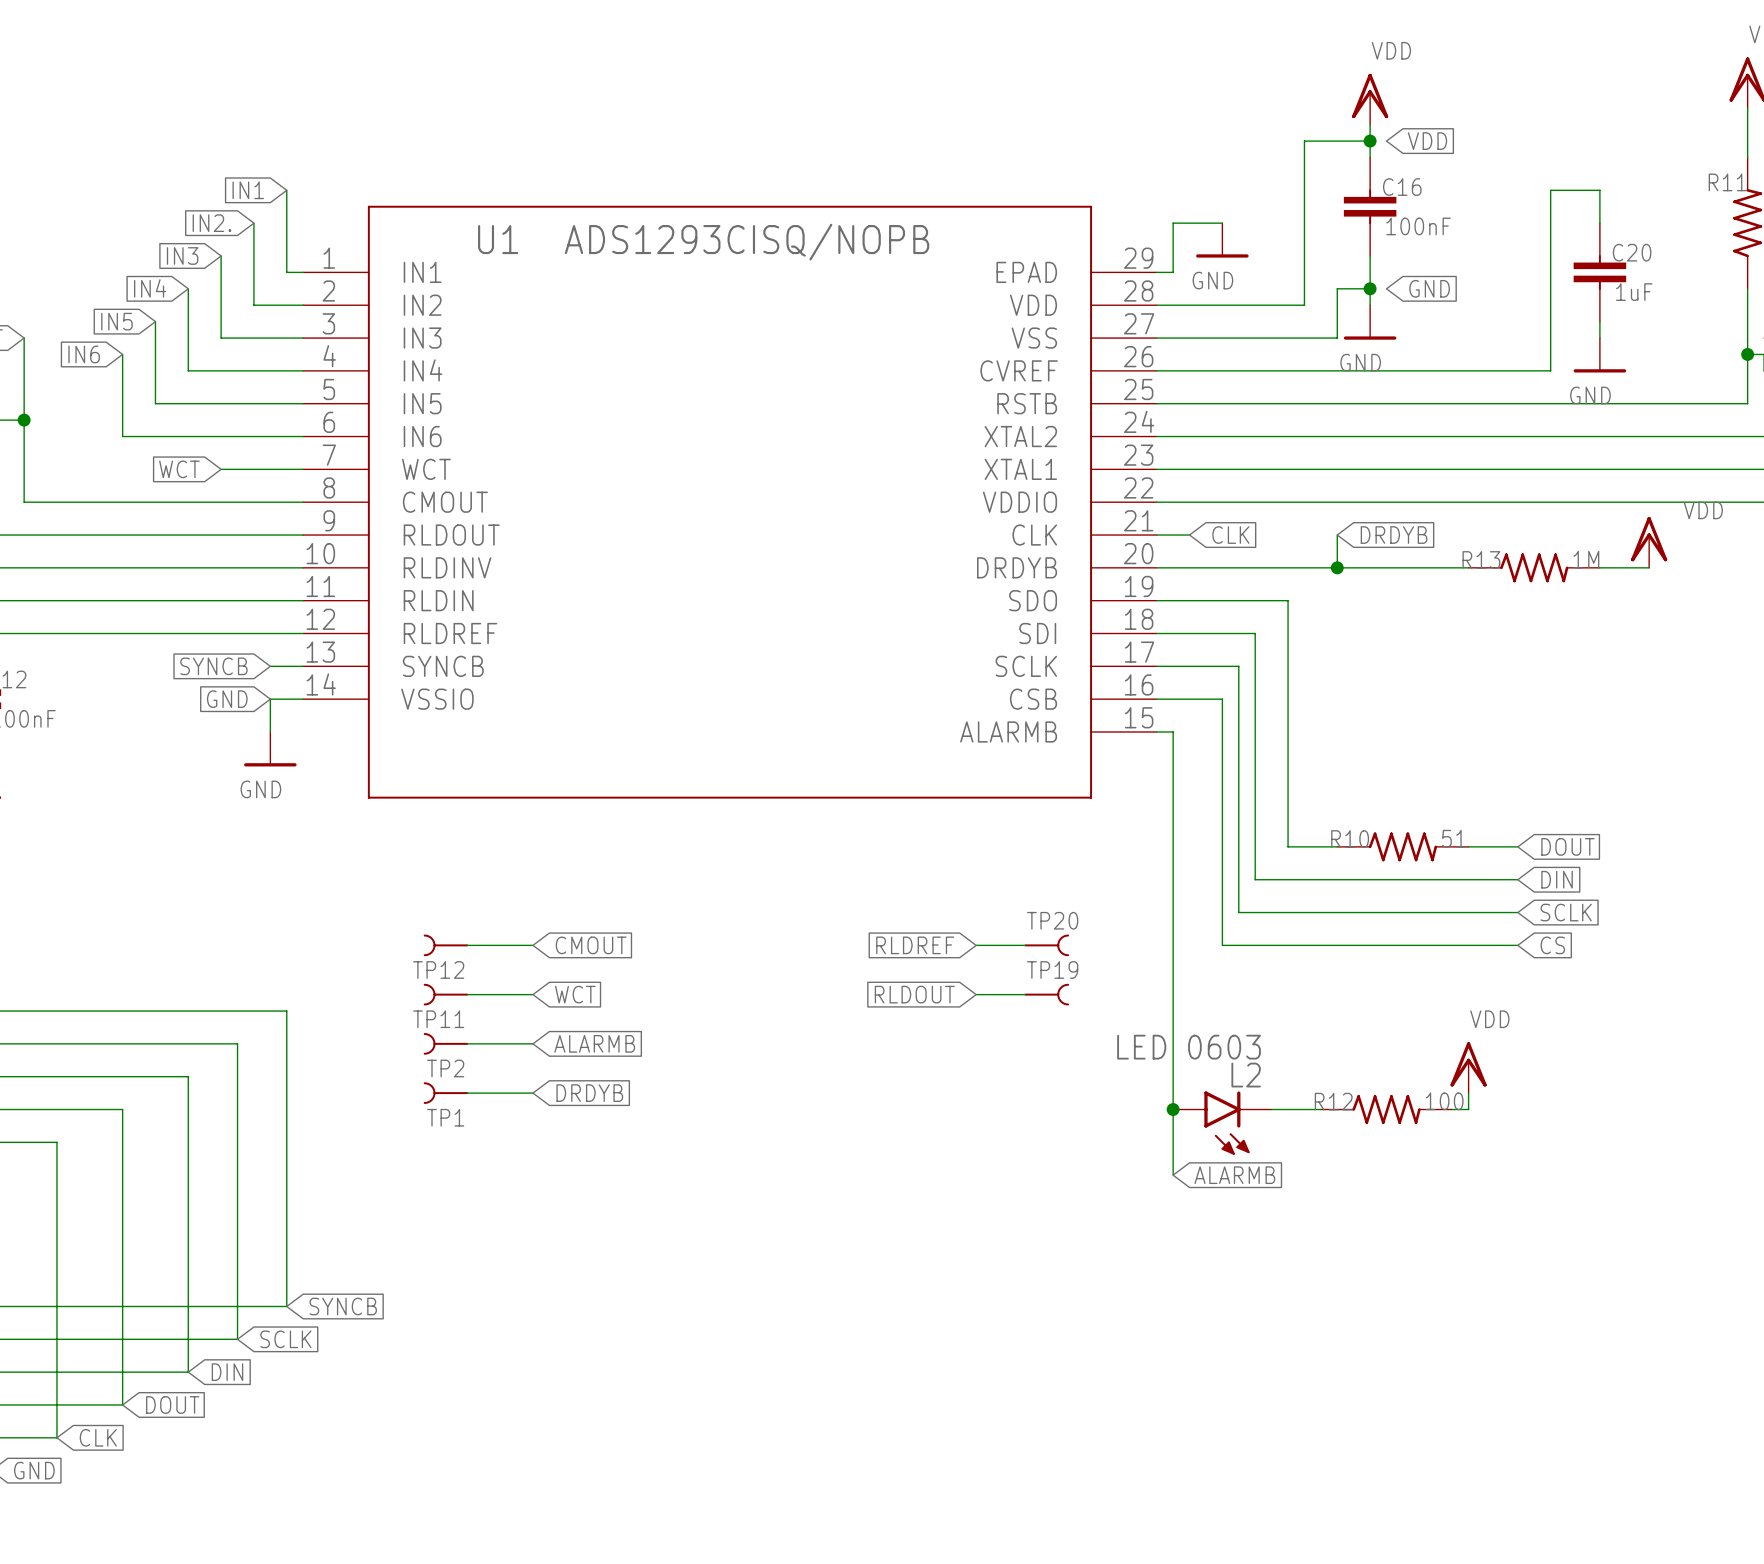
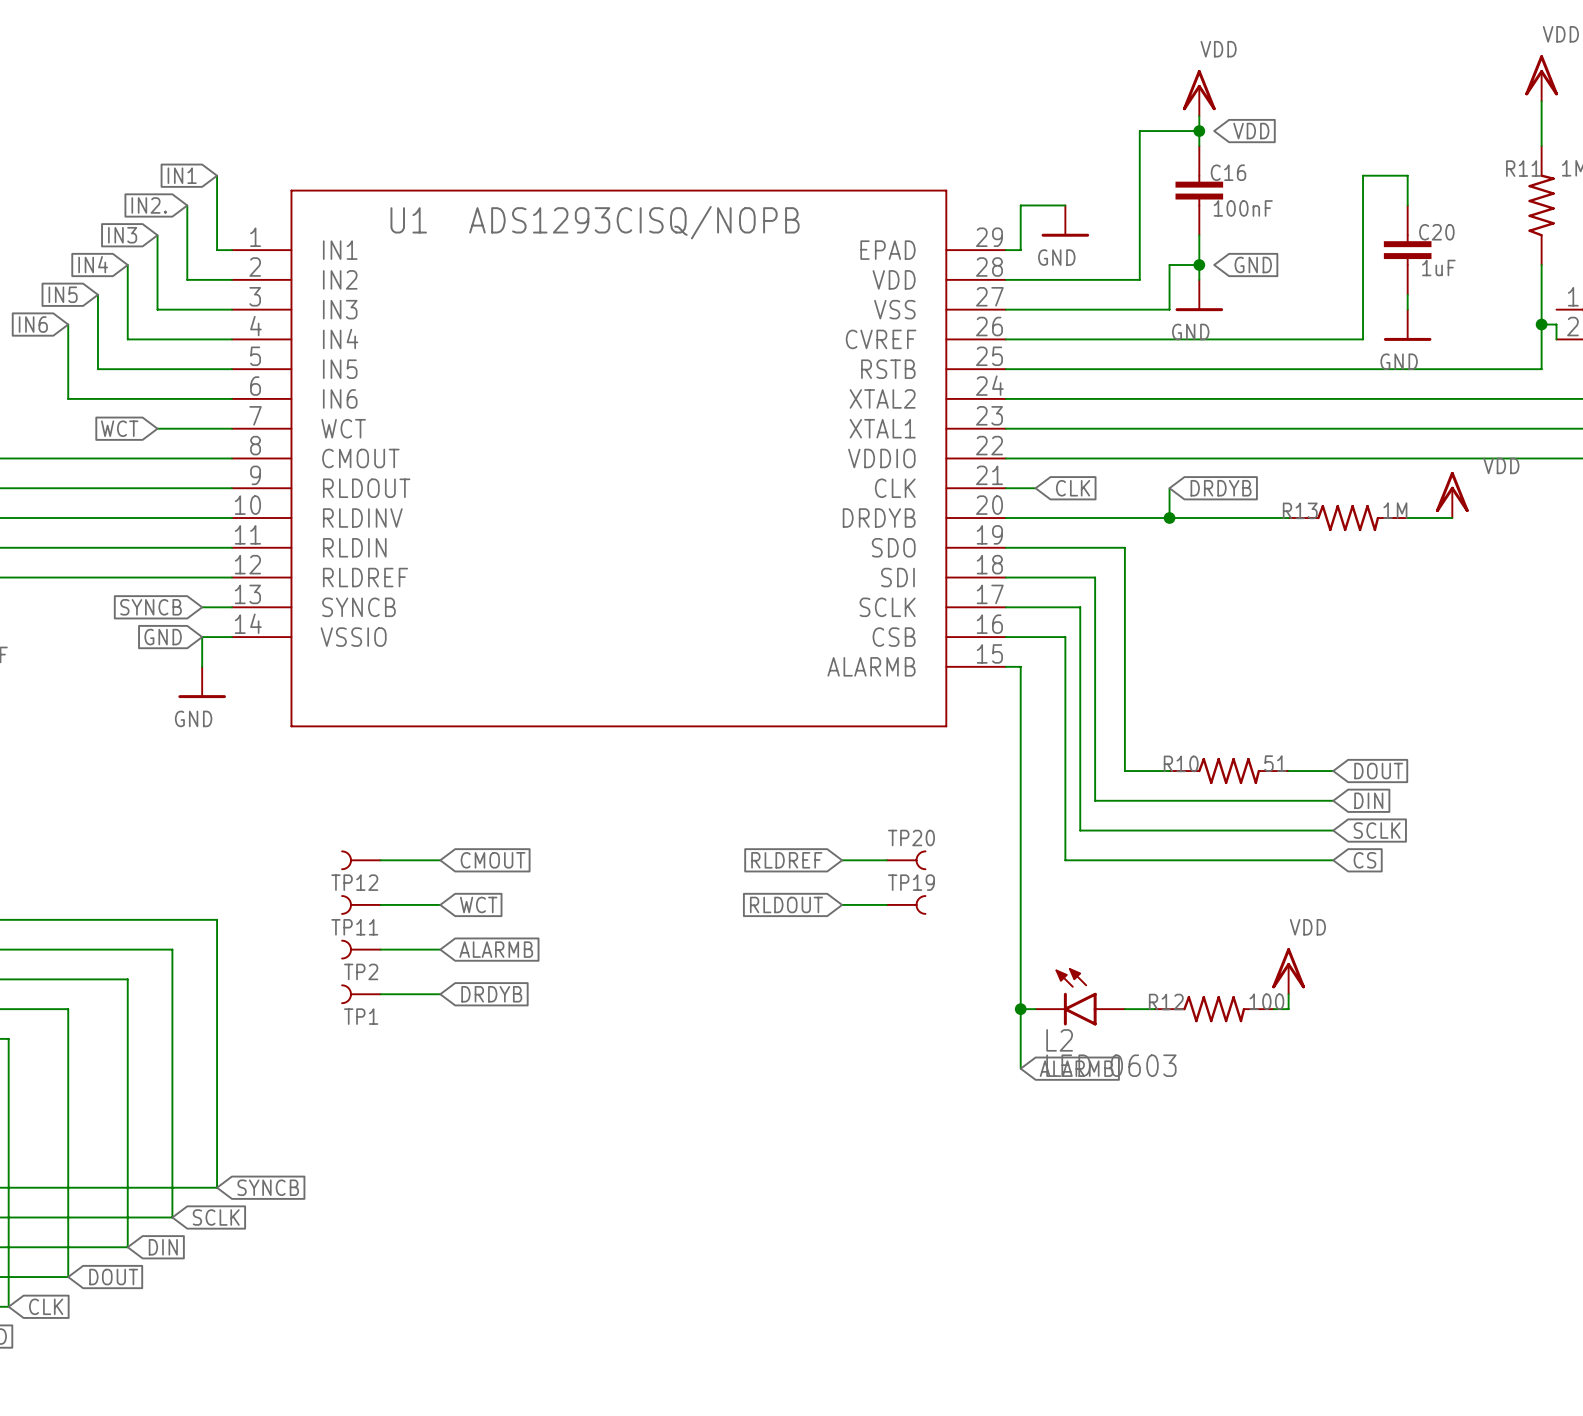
L2 rotation: 0° (1226, 1123) -> 180° (1076, 996)

